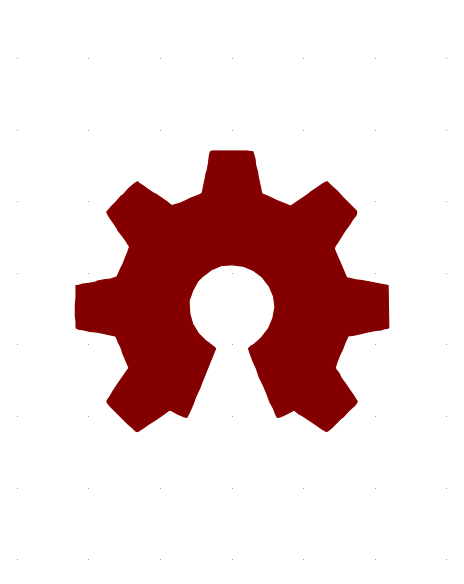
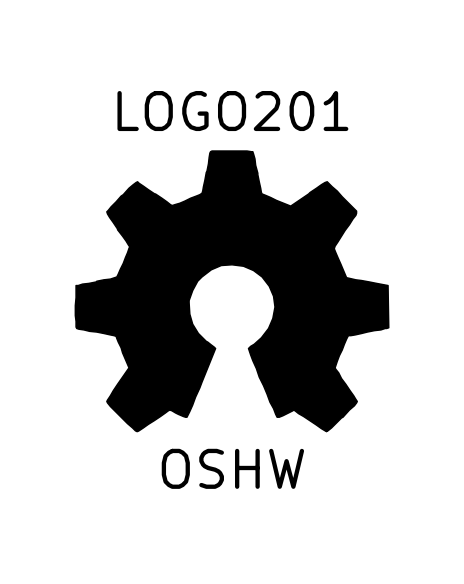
LOGO201 name: none -> LOGO201 (232, 111)
LOGO201 value: none -> OSHW (232, 468)

